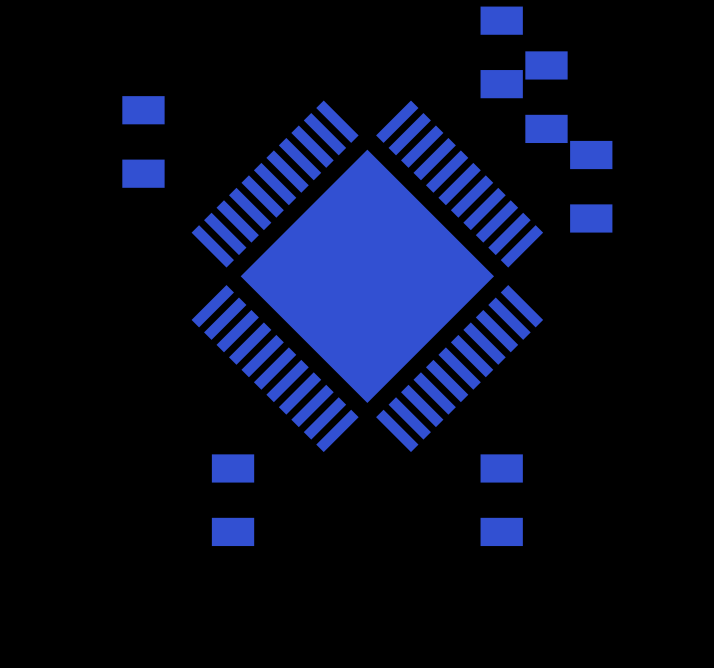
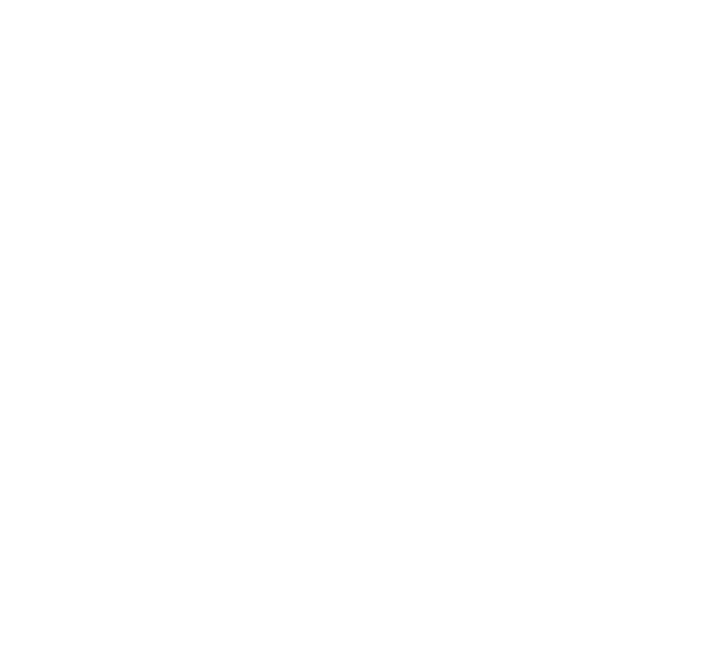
part: (501, 52) -> none
part: (546, 97) -> none
part: (143, 141) -> none
part: (591, 186) -> none
part: (367, 276) -> none
part: (233, 500) -> none
part: (501, 500) -> none

